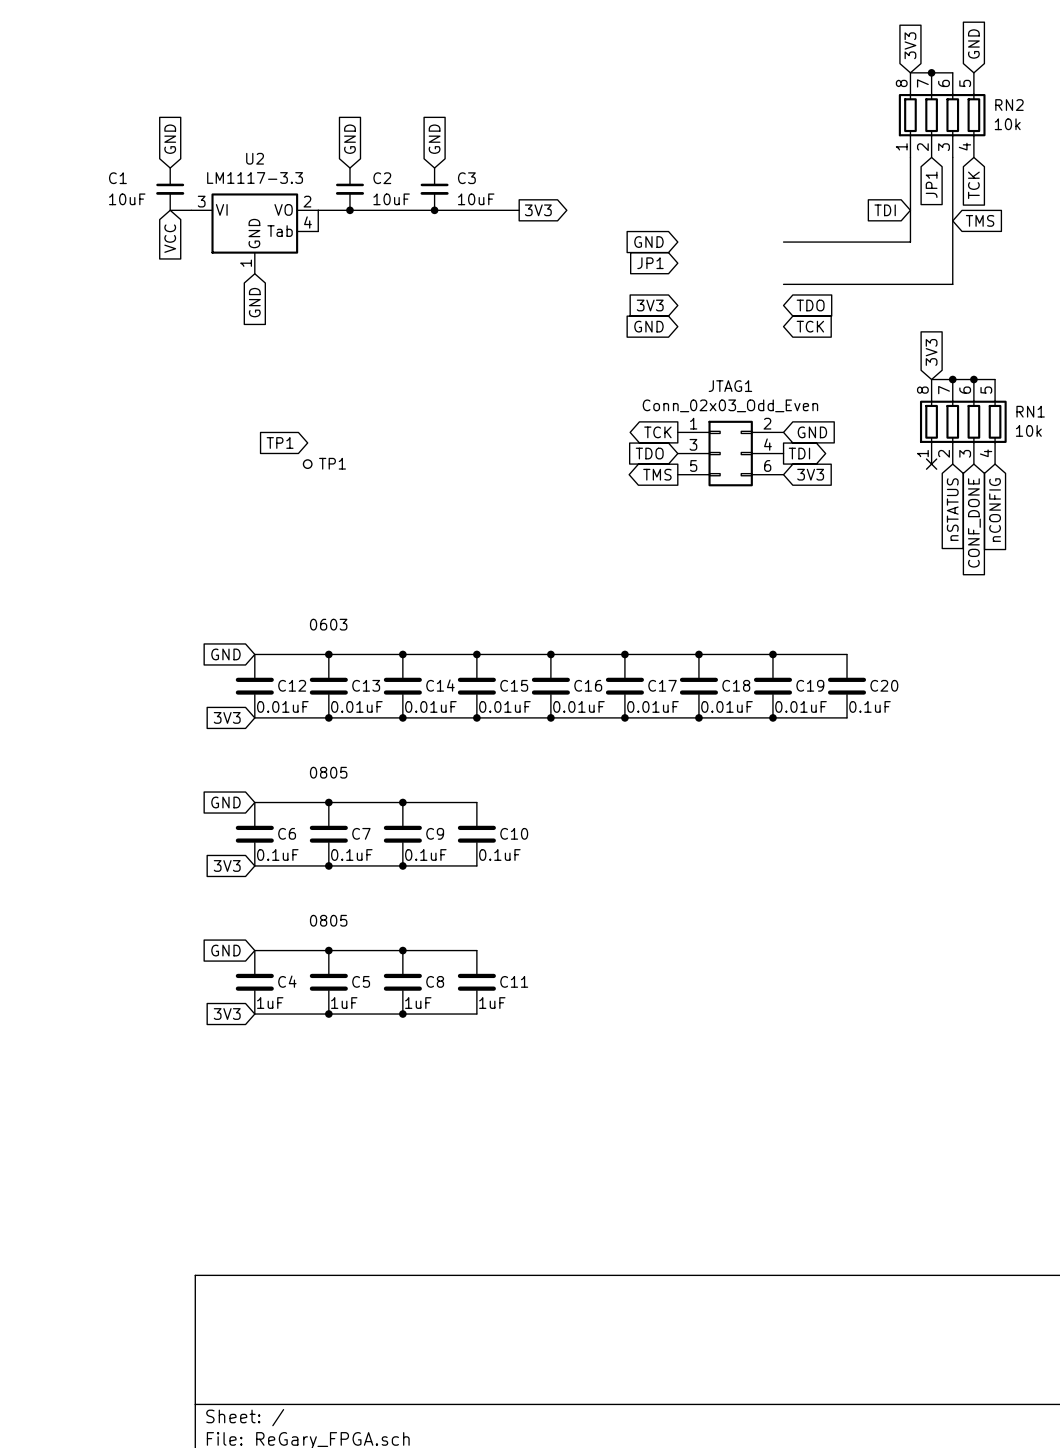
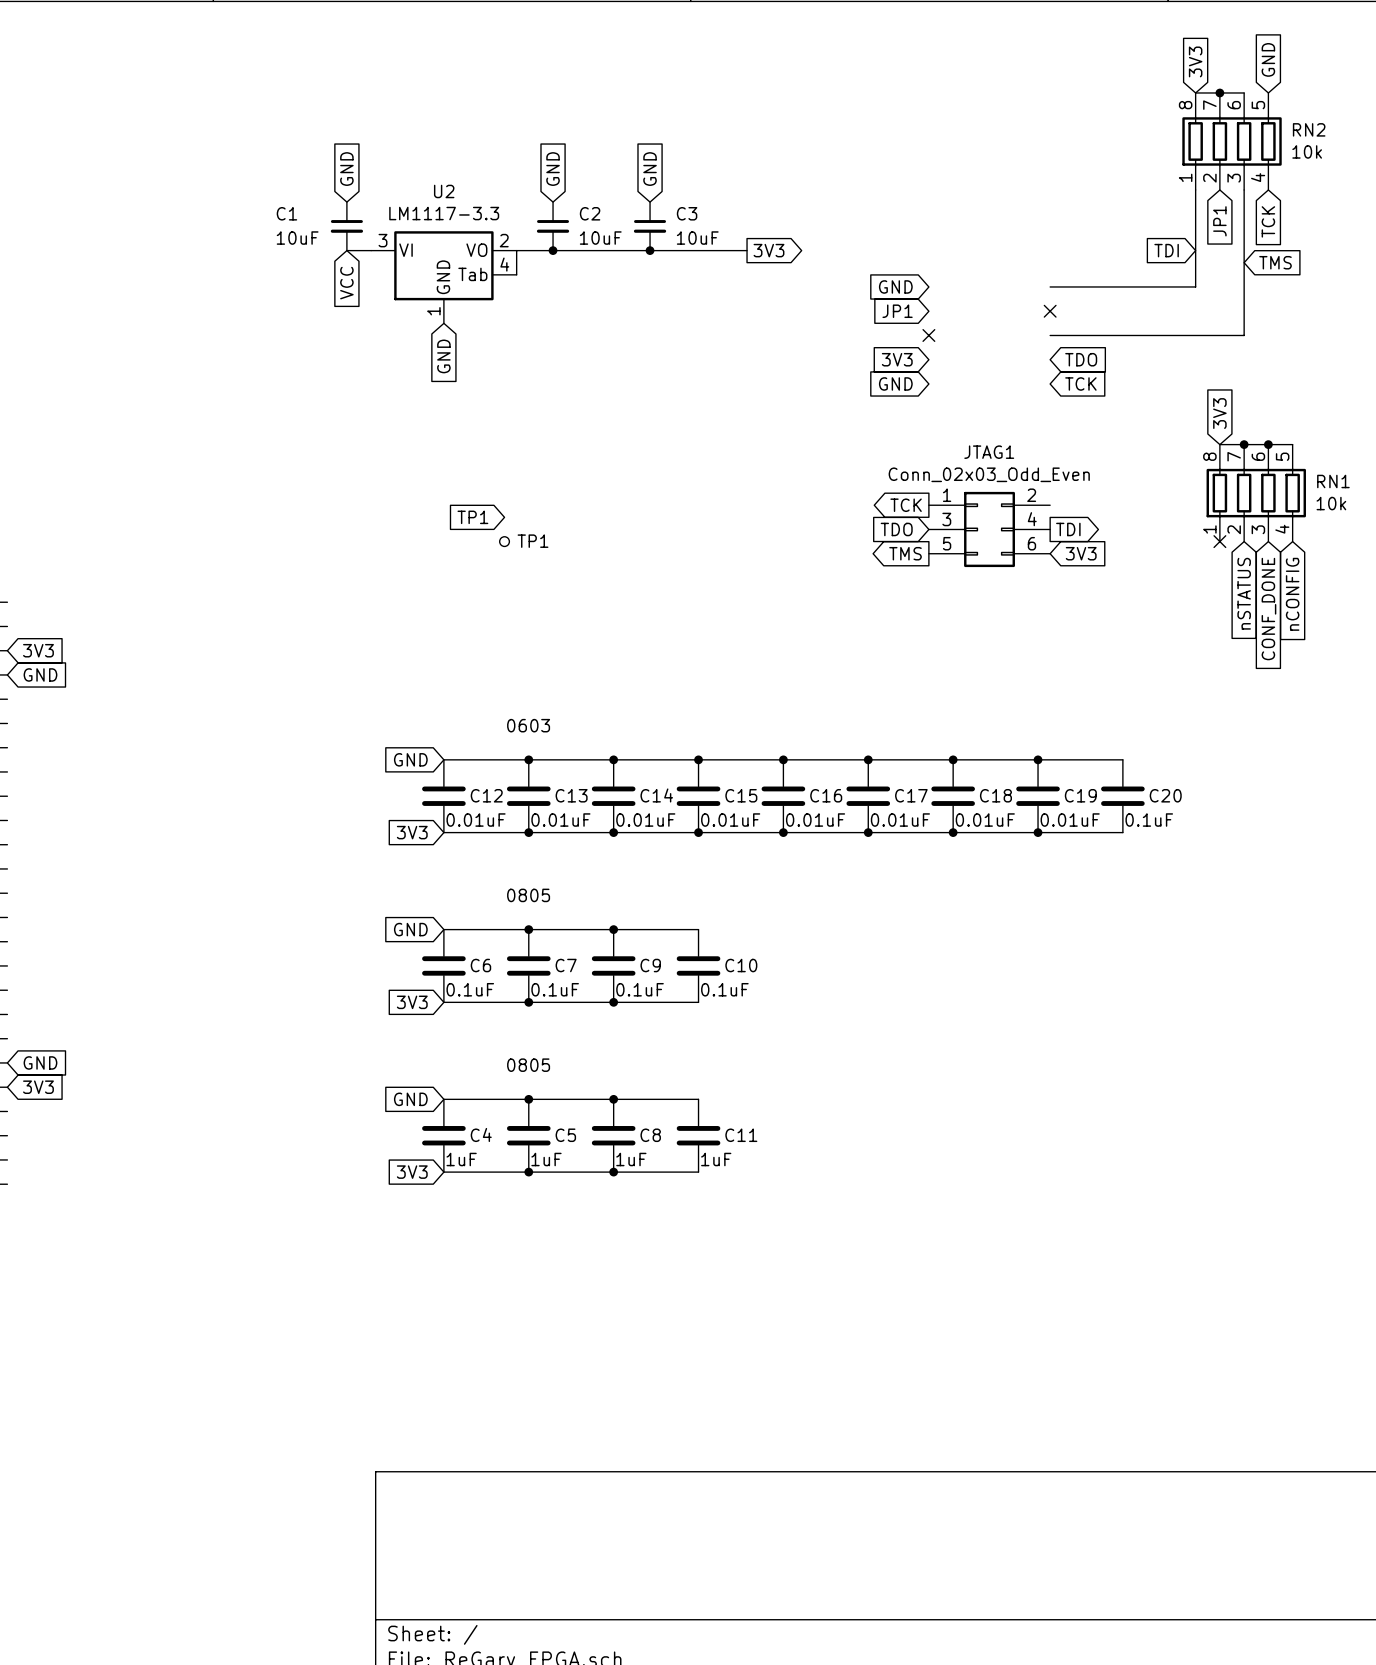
no-connect mark: none -> (1050, 311)
no-connect mark: none -> (928, 335)
global label: GND (812, 432) -> none

